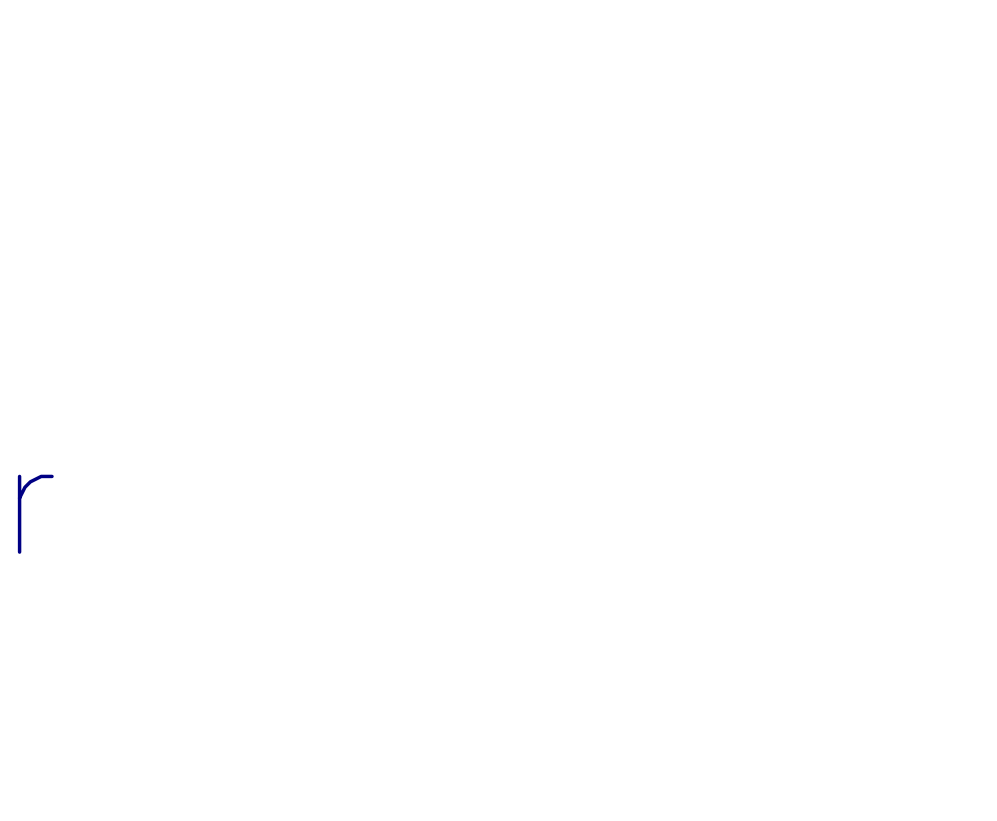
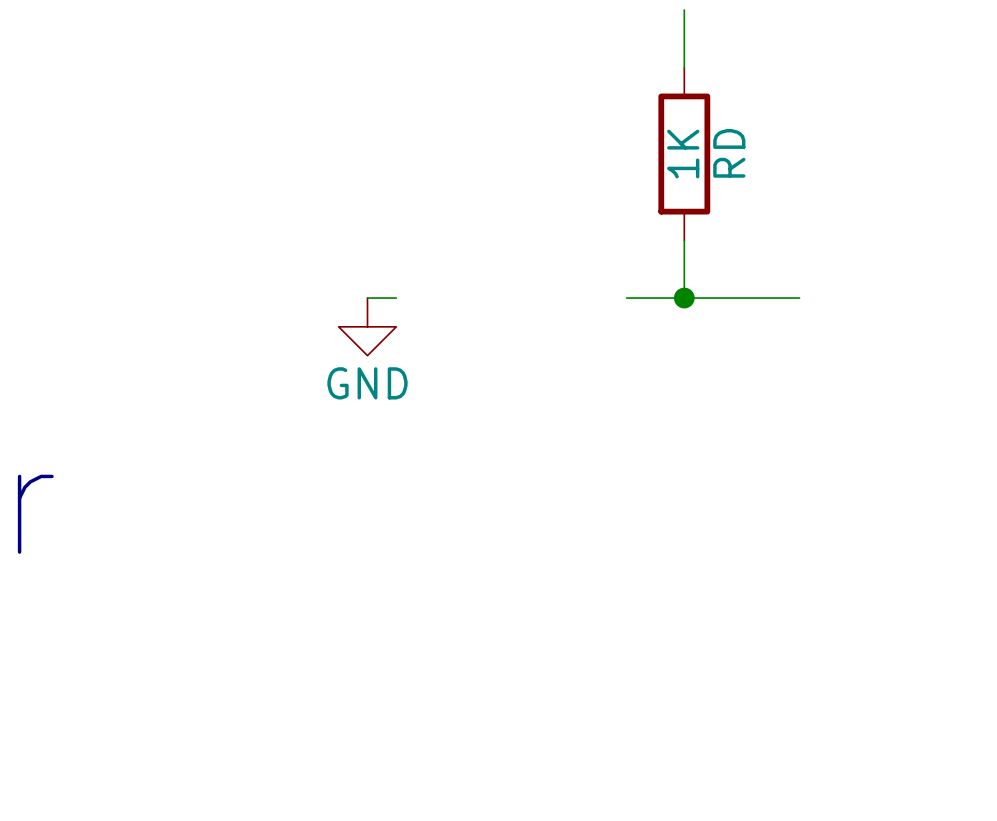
wire: none -> (684, 10) (684, 67)
RD: none -> 1K (684, 154)
wire: none -> (684, 240) (684, 298)
wire: none -> (367, 298) (396, 298)
wire: none -> (626, 298) (799, 298)
junction: none -> (684, 298)
power symbol: none -> GND (367, 326)

